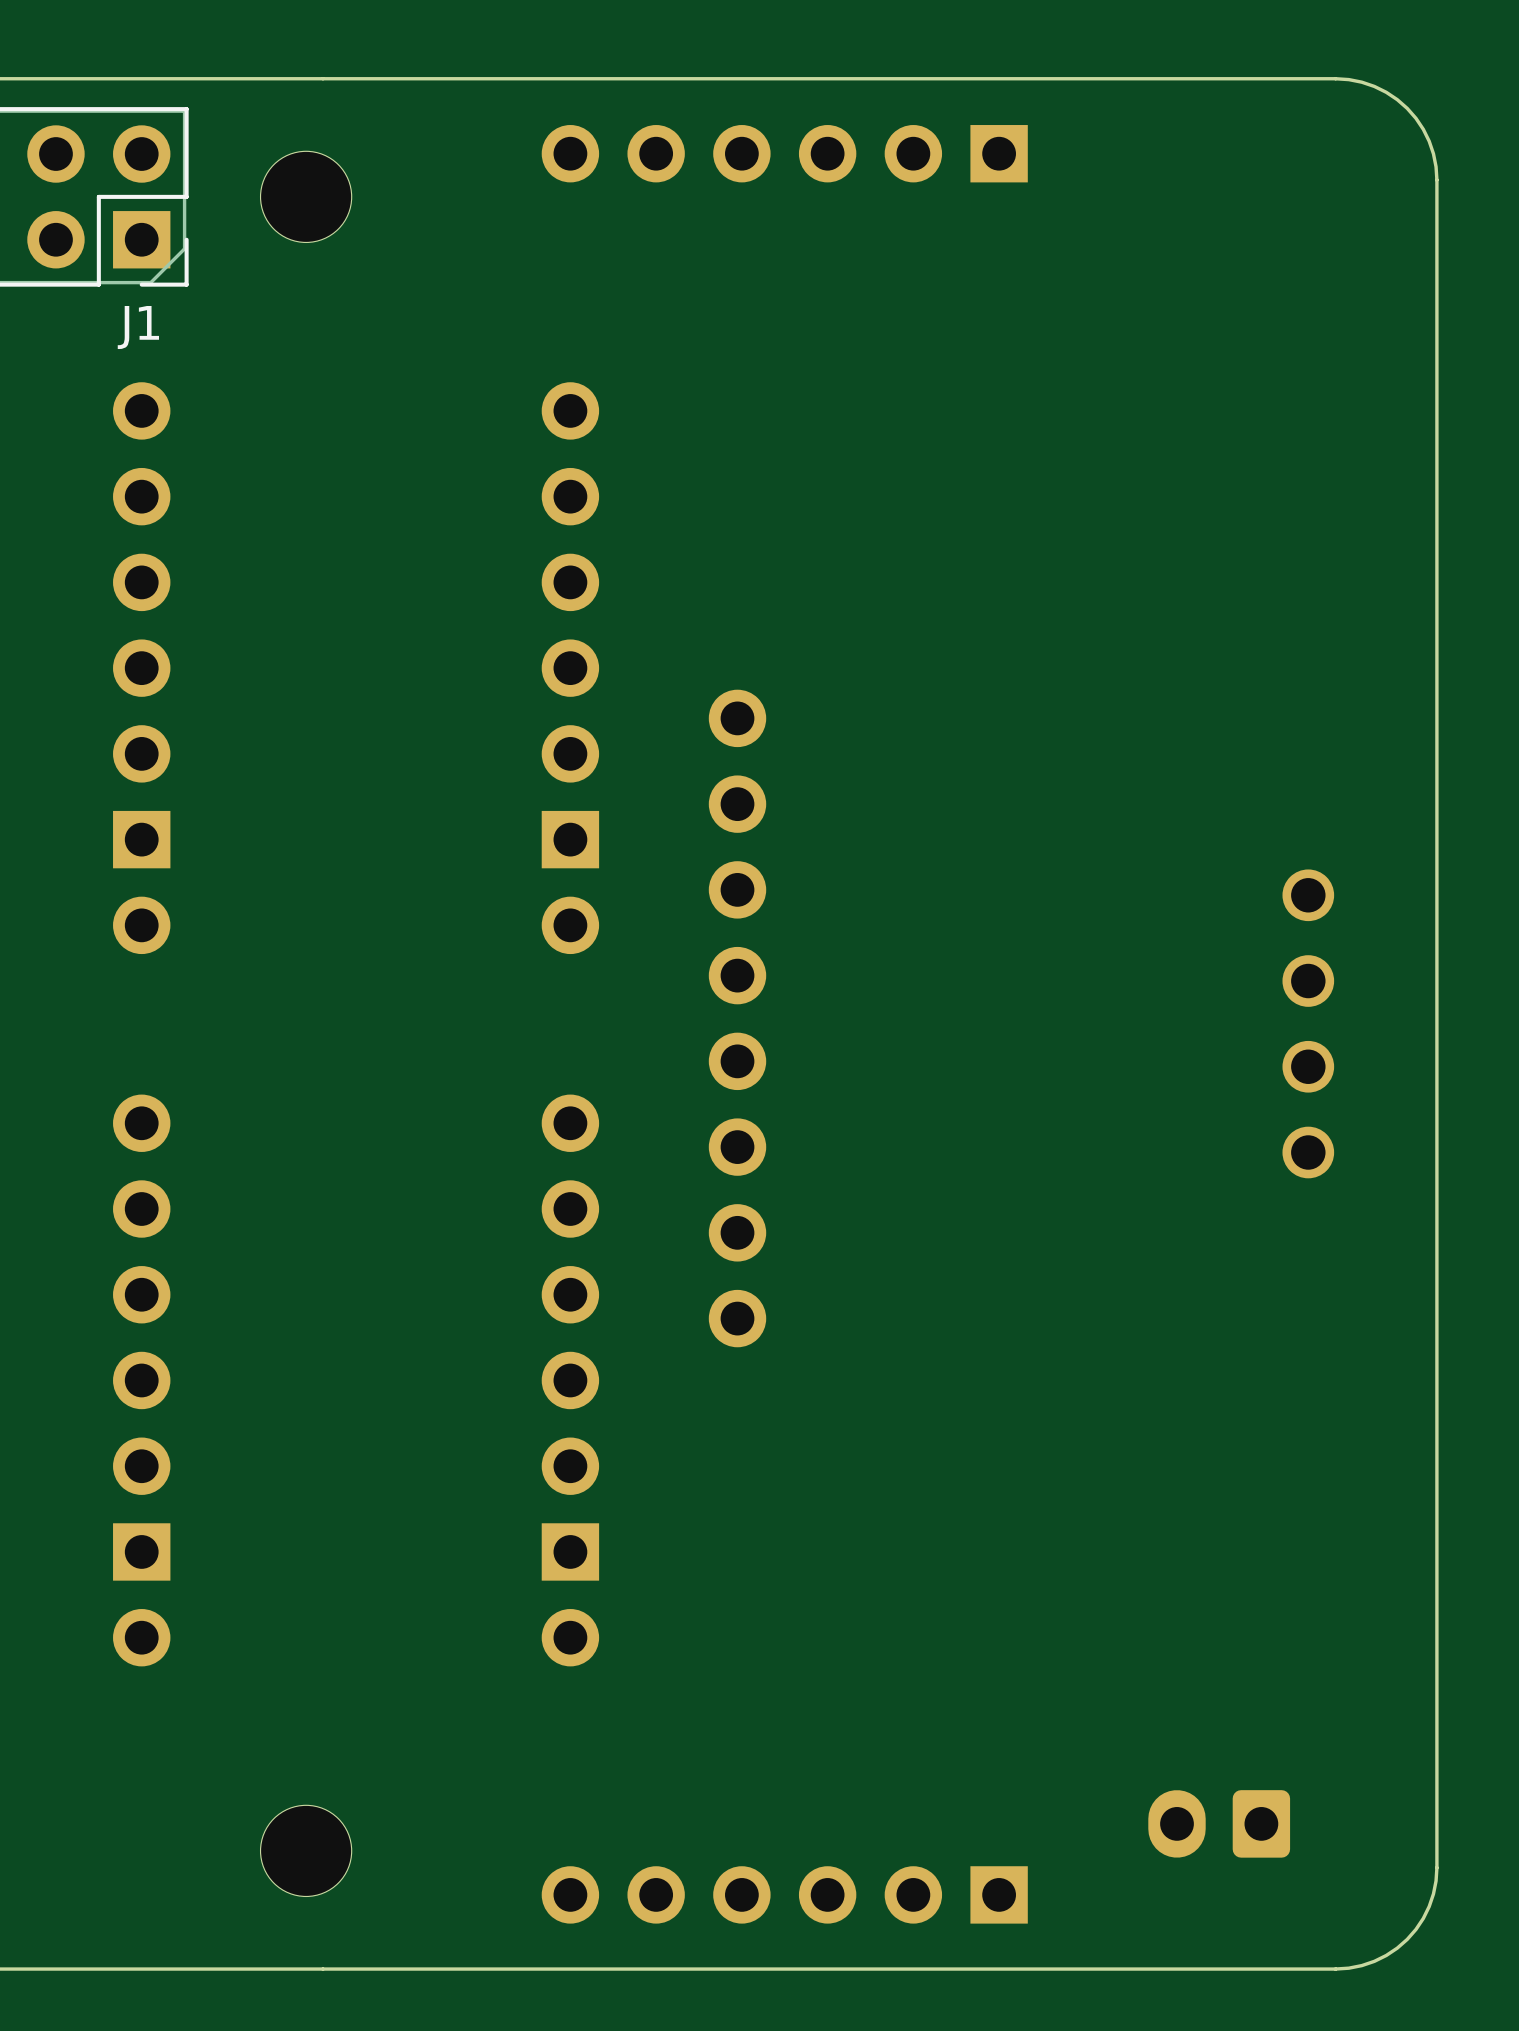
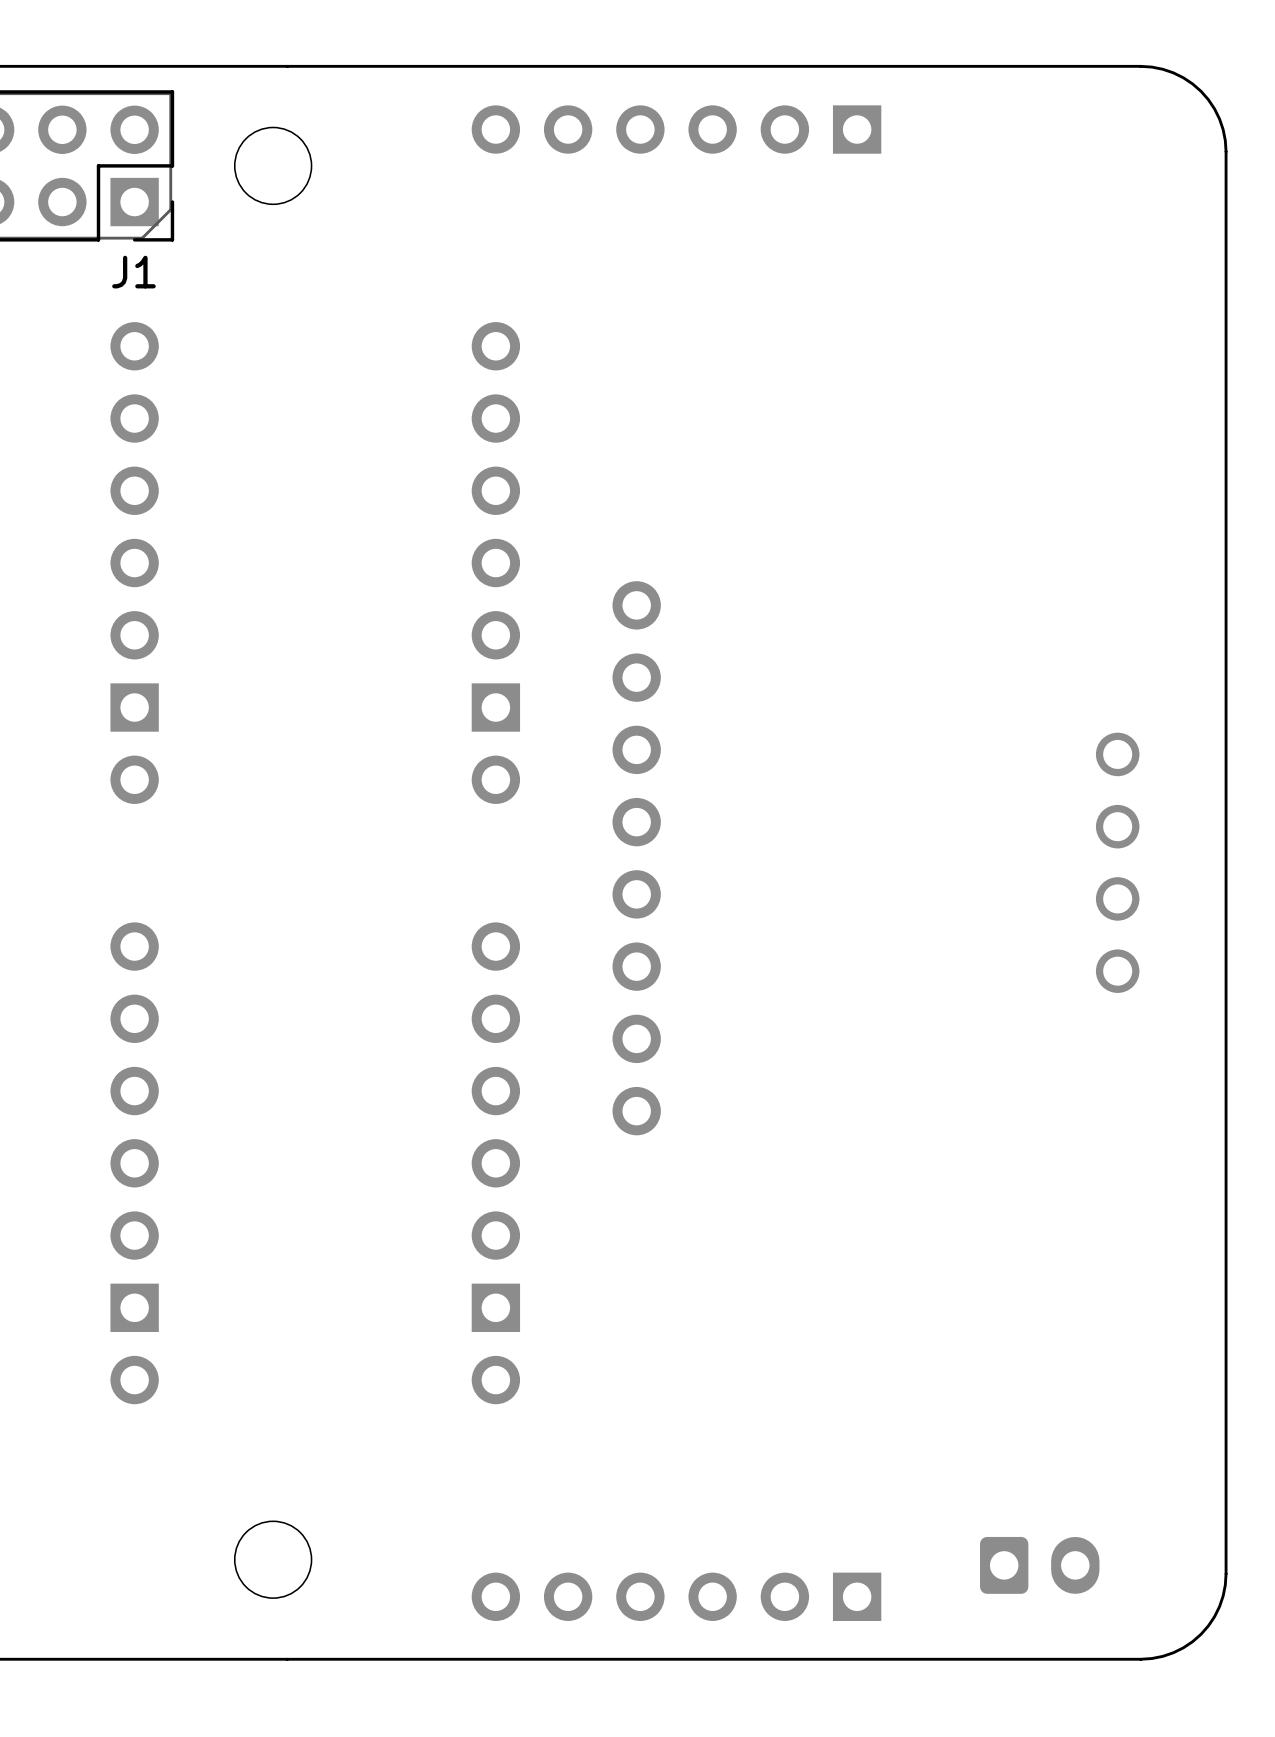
part rotation: 0° (1219, 1823) -> 180° (1039, 1565)

